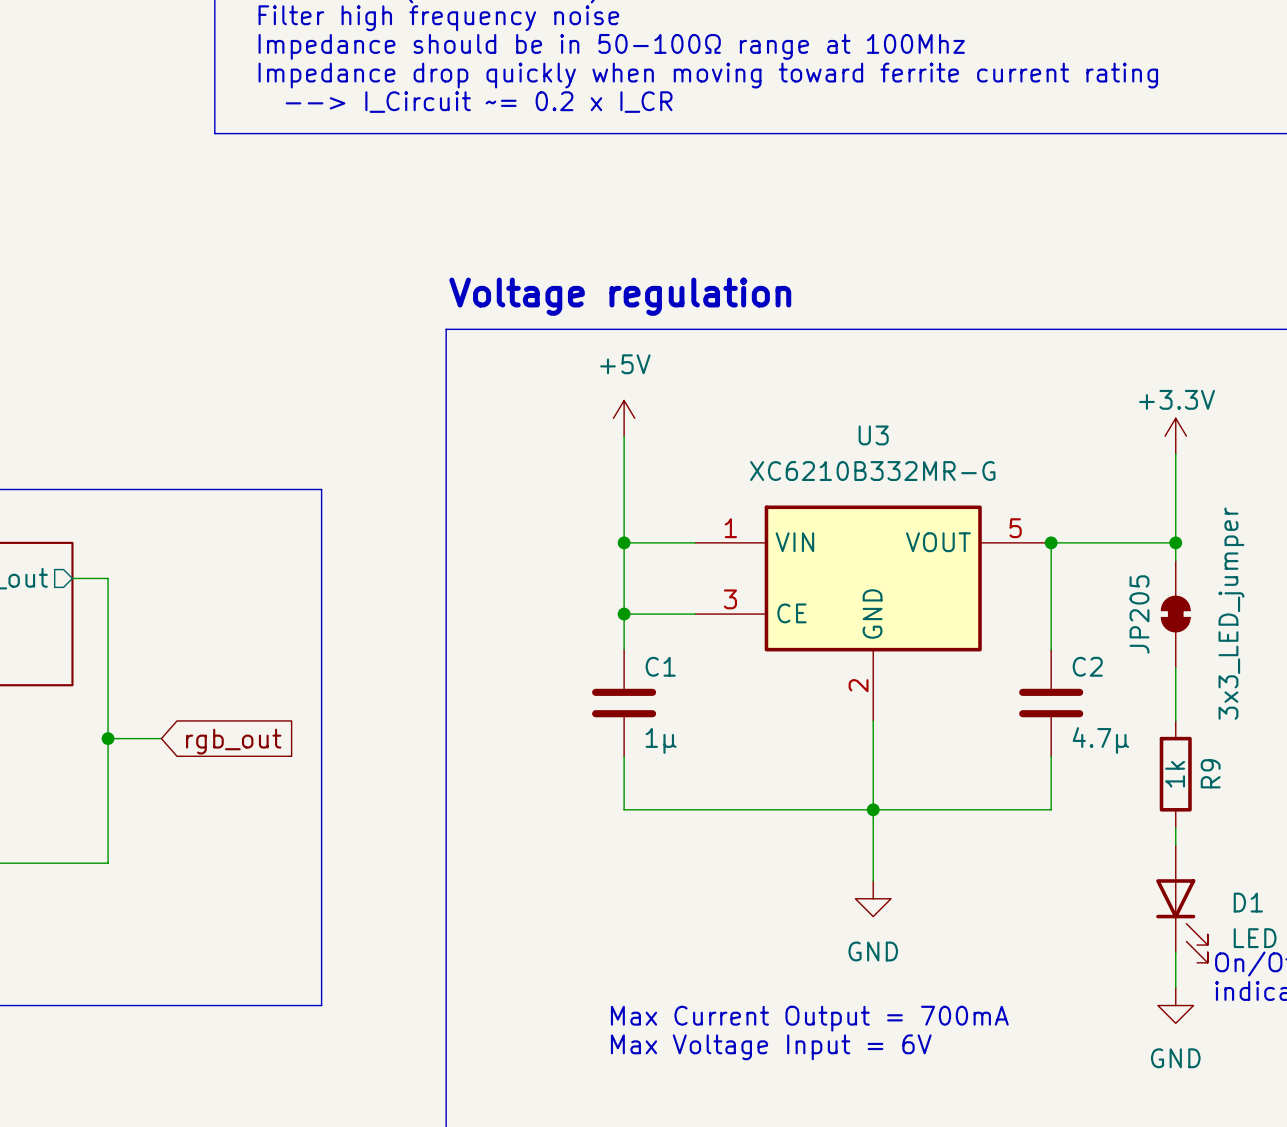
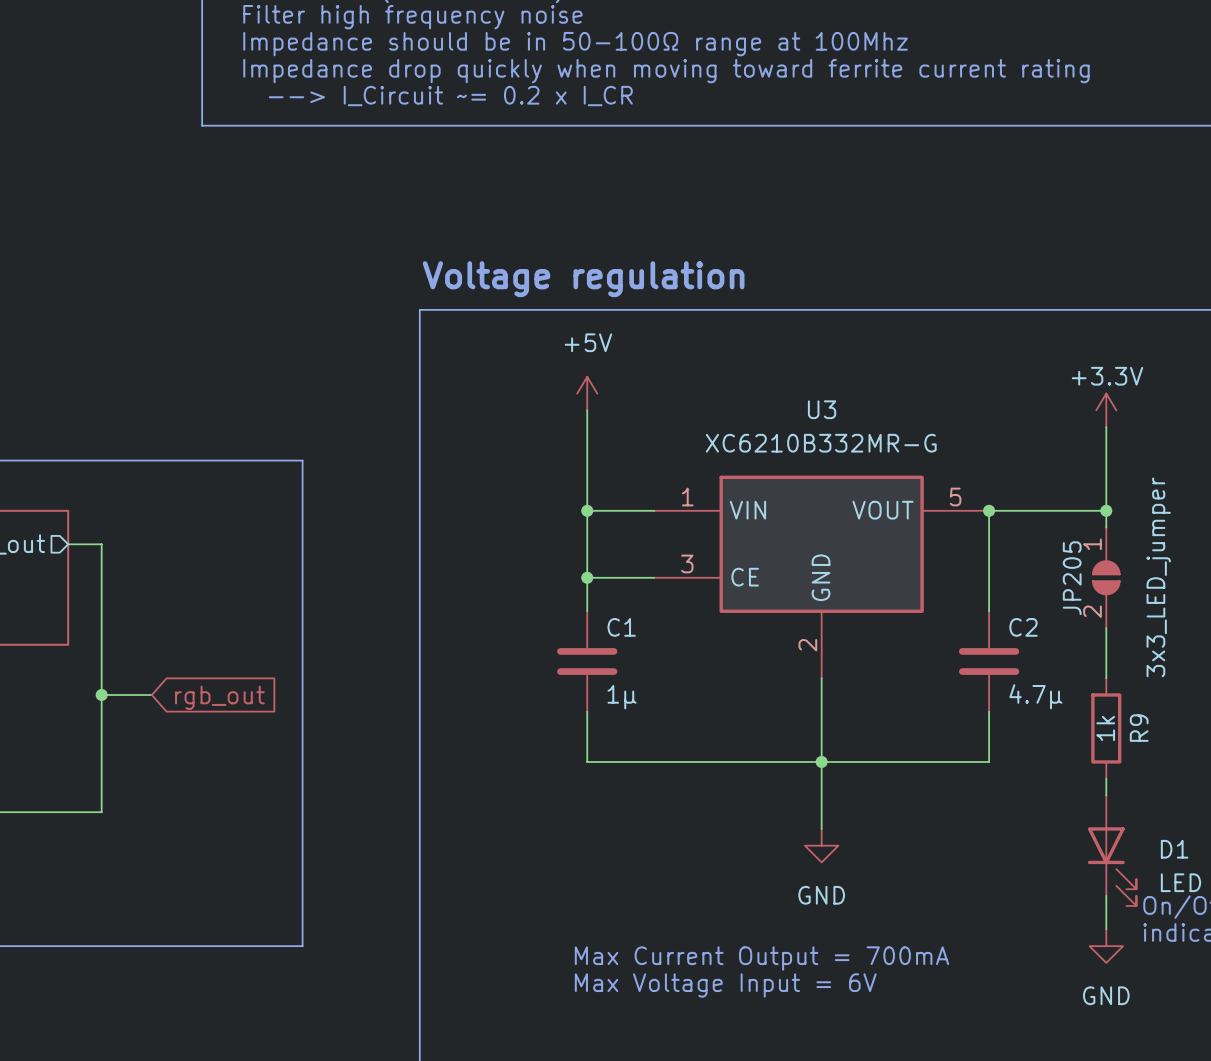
JP205 symbol: [1161, 560, 1190, 668] -> [1092, 527, 1120, 629]

